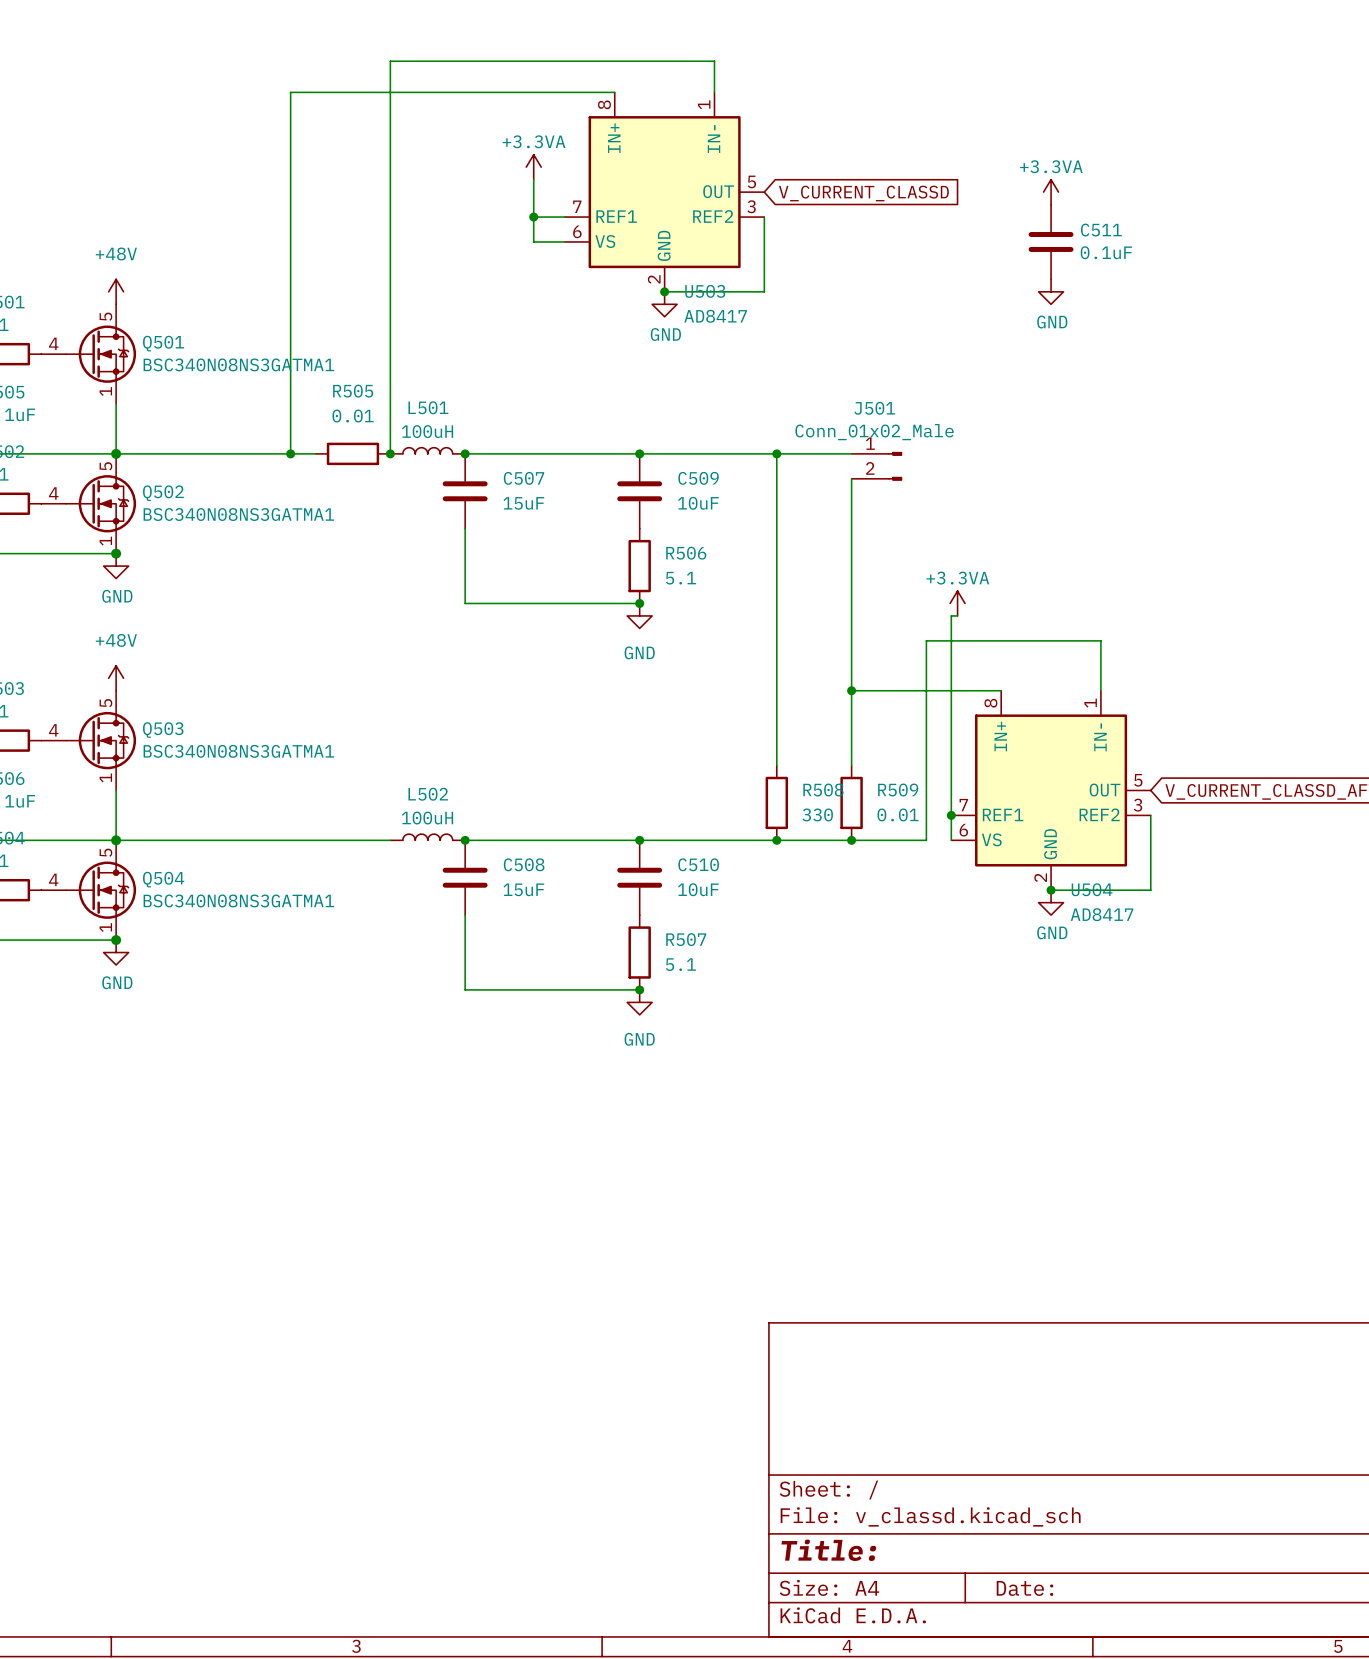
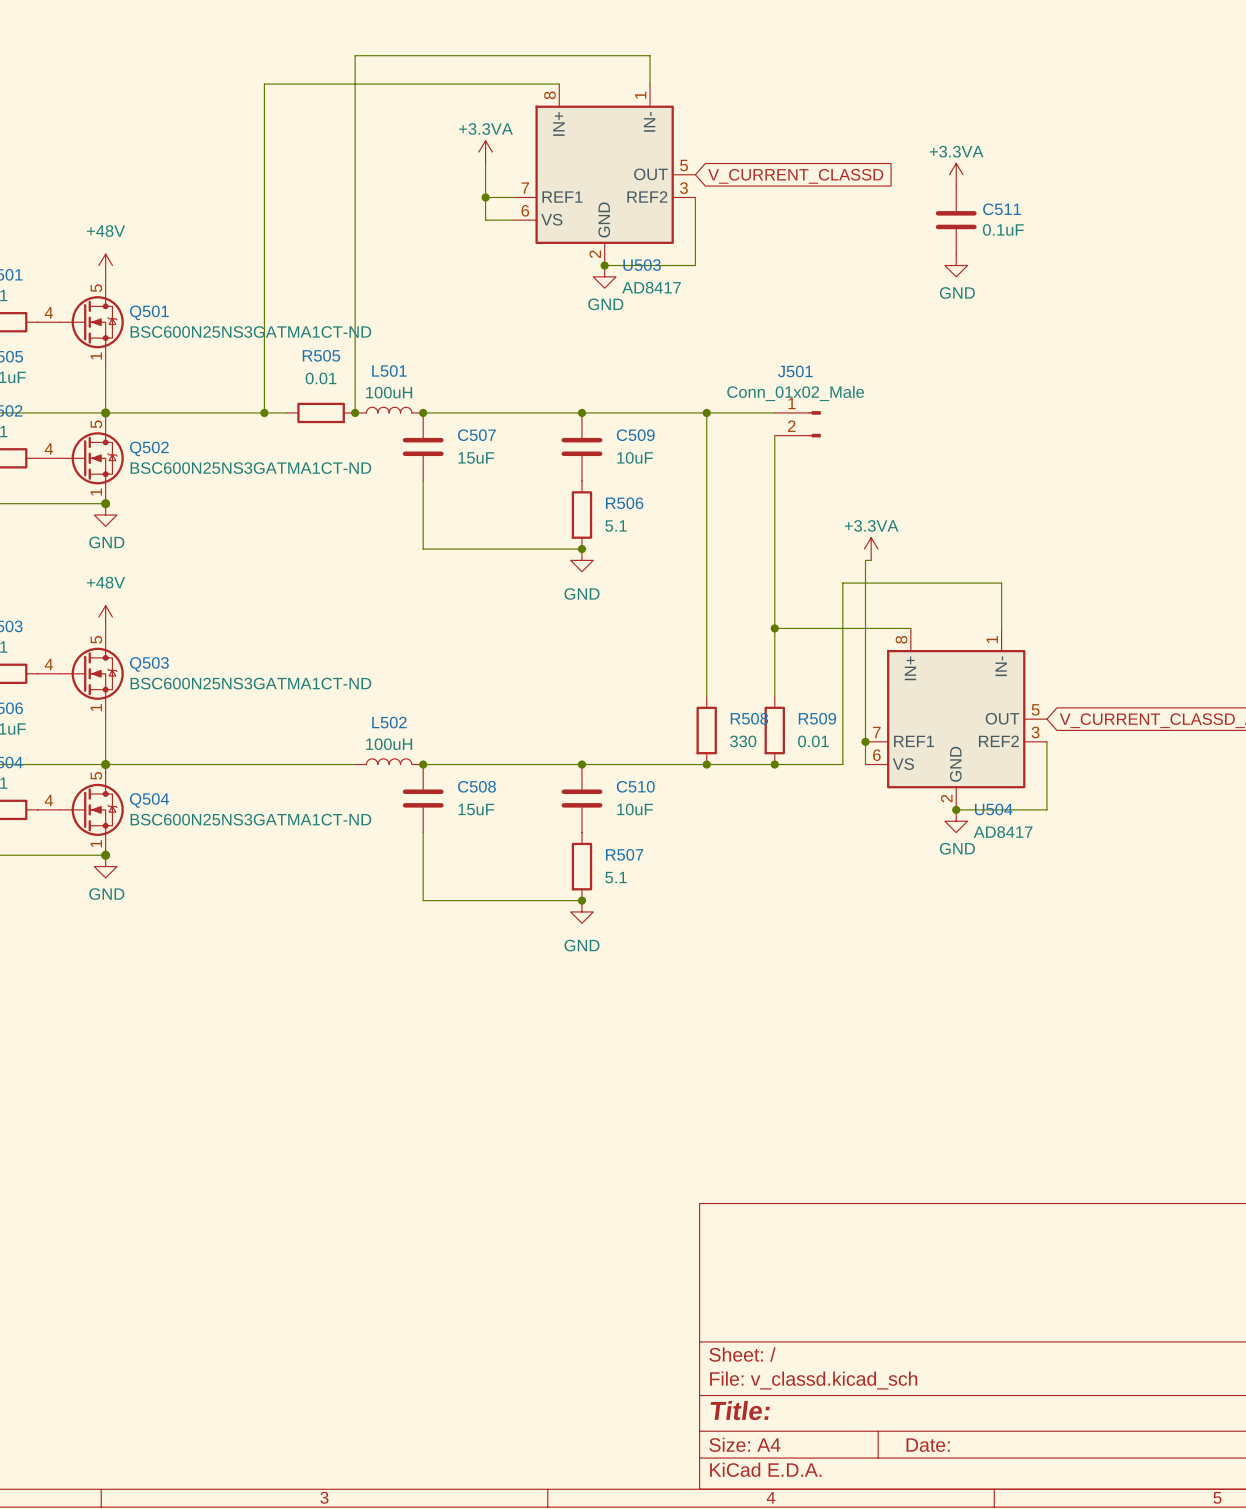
Q501 value: BSC340N08NS3GATMA1 (238, 364) -> BSC600N25NS3GATMA1CT-ND (250, 332)
Q502 value: BSC340N08NS3GATMA1 (238, 514) -> BSC600N25NS3GATMA1CT-ND (250, 468)
Q503 value: BSC340N08NS3GATMA1 (238, 751) -> BSC600N25NS3GATMA1CT-ND (250, 683)
Q504 value: BSC340N08NS3GATMA1 (238, 900) -> BSC600N25NS3GATMA1CT-ND (250, 819)

